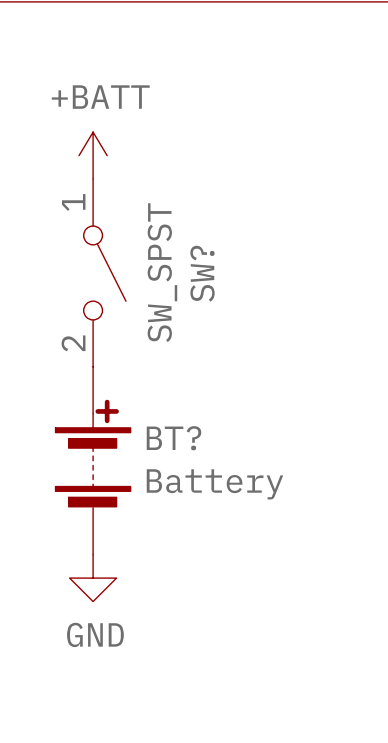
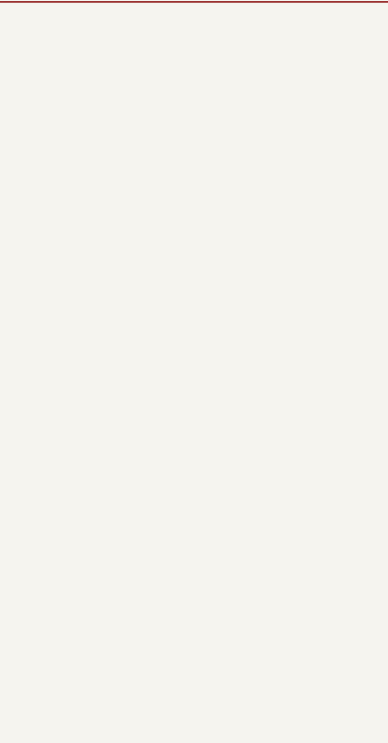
power symbol: +BATT (93, 155) -> none
SW?: SW_SPST (104, 273) -> none
BT?: Battery (93, 460) -> none
power symbol: GND (93, 578) -> none

